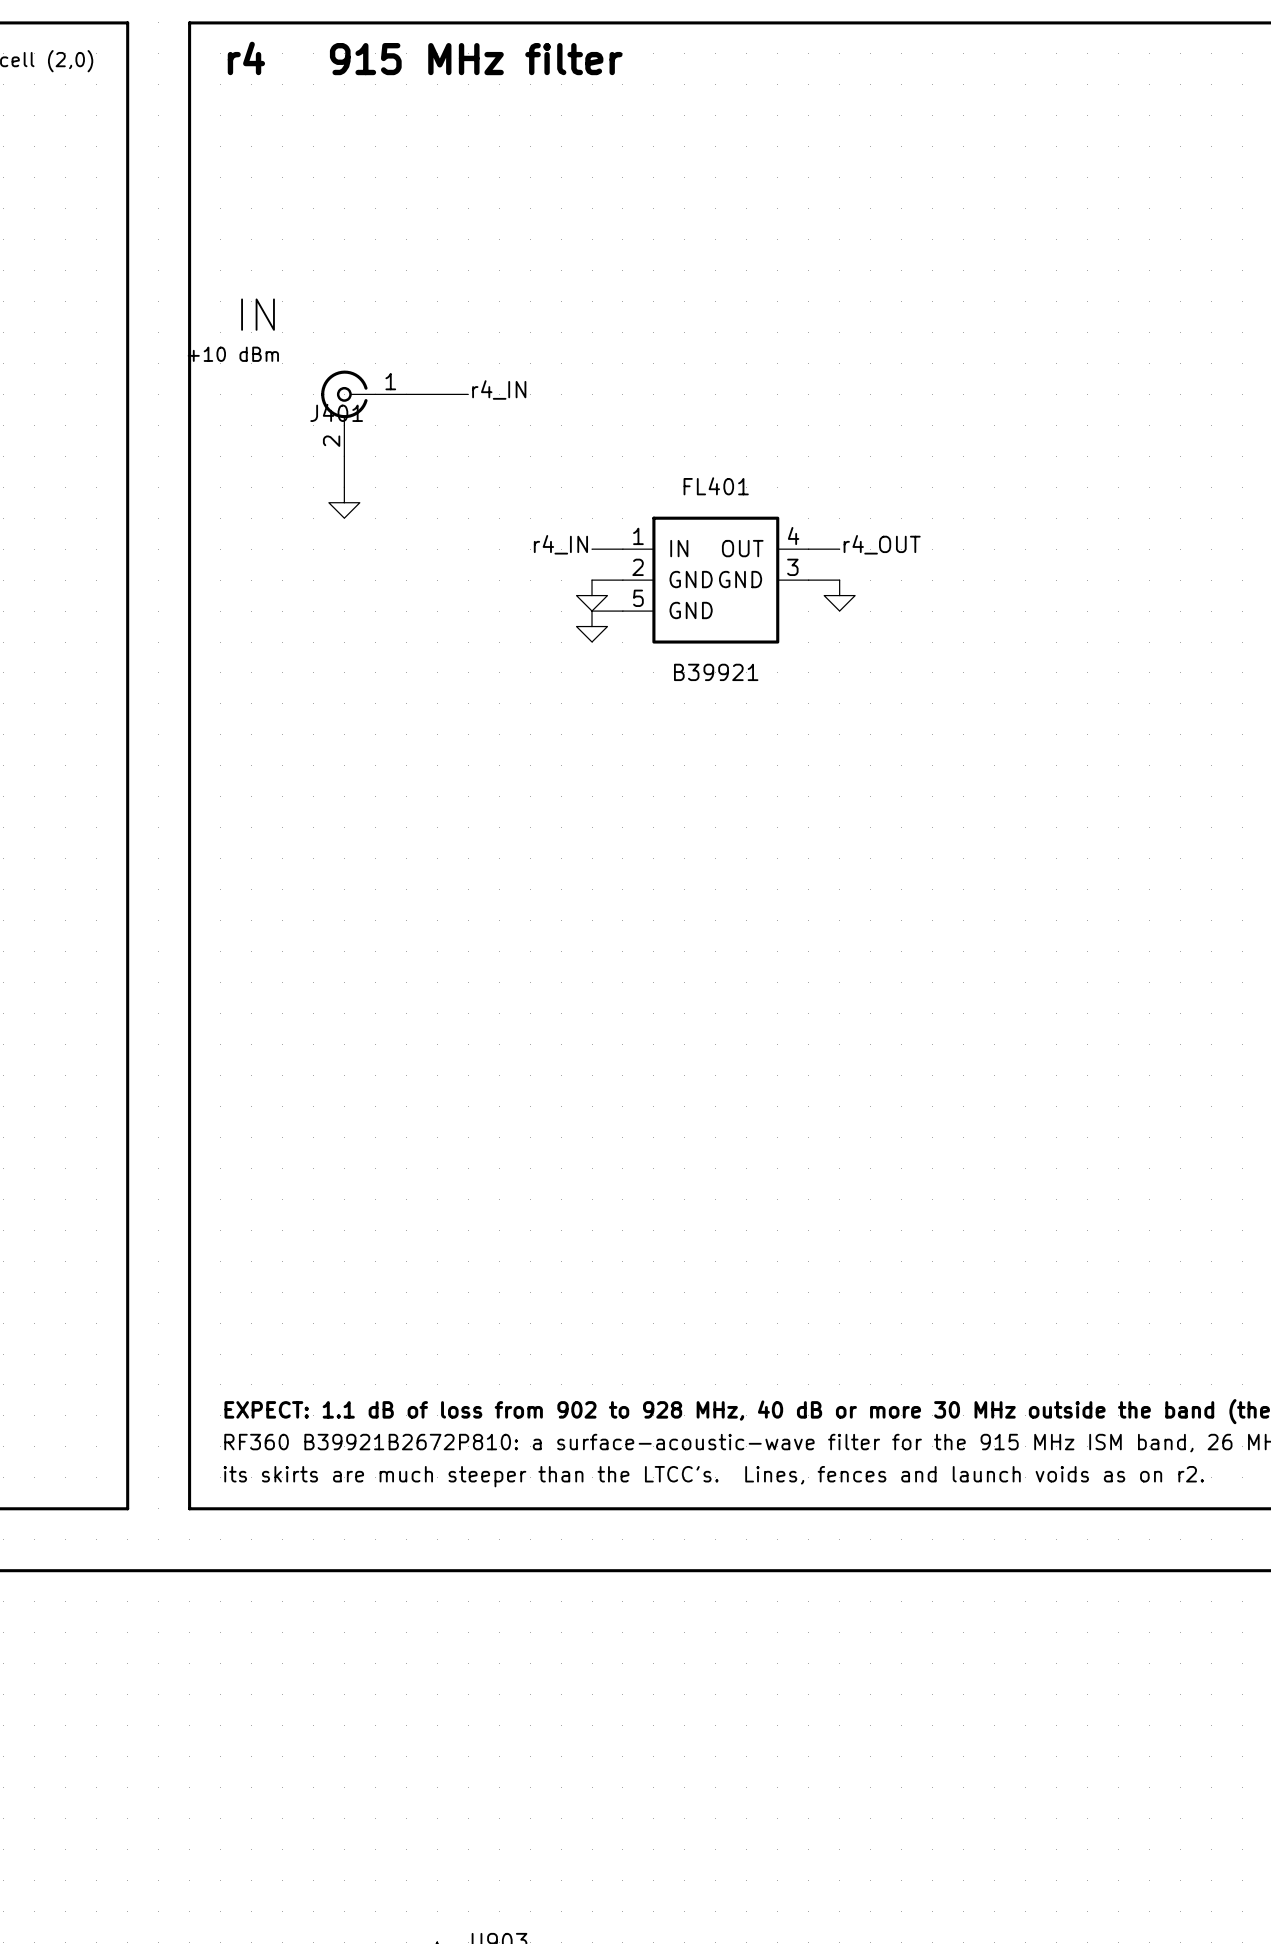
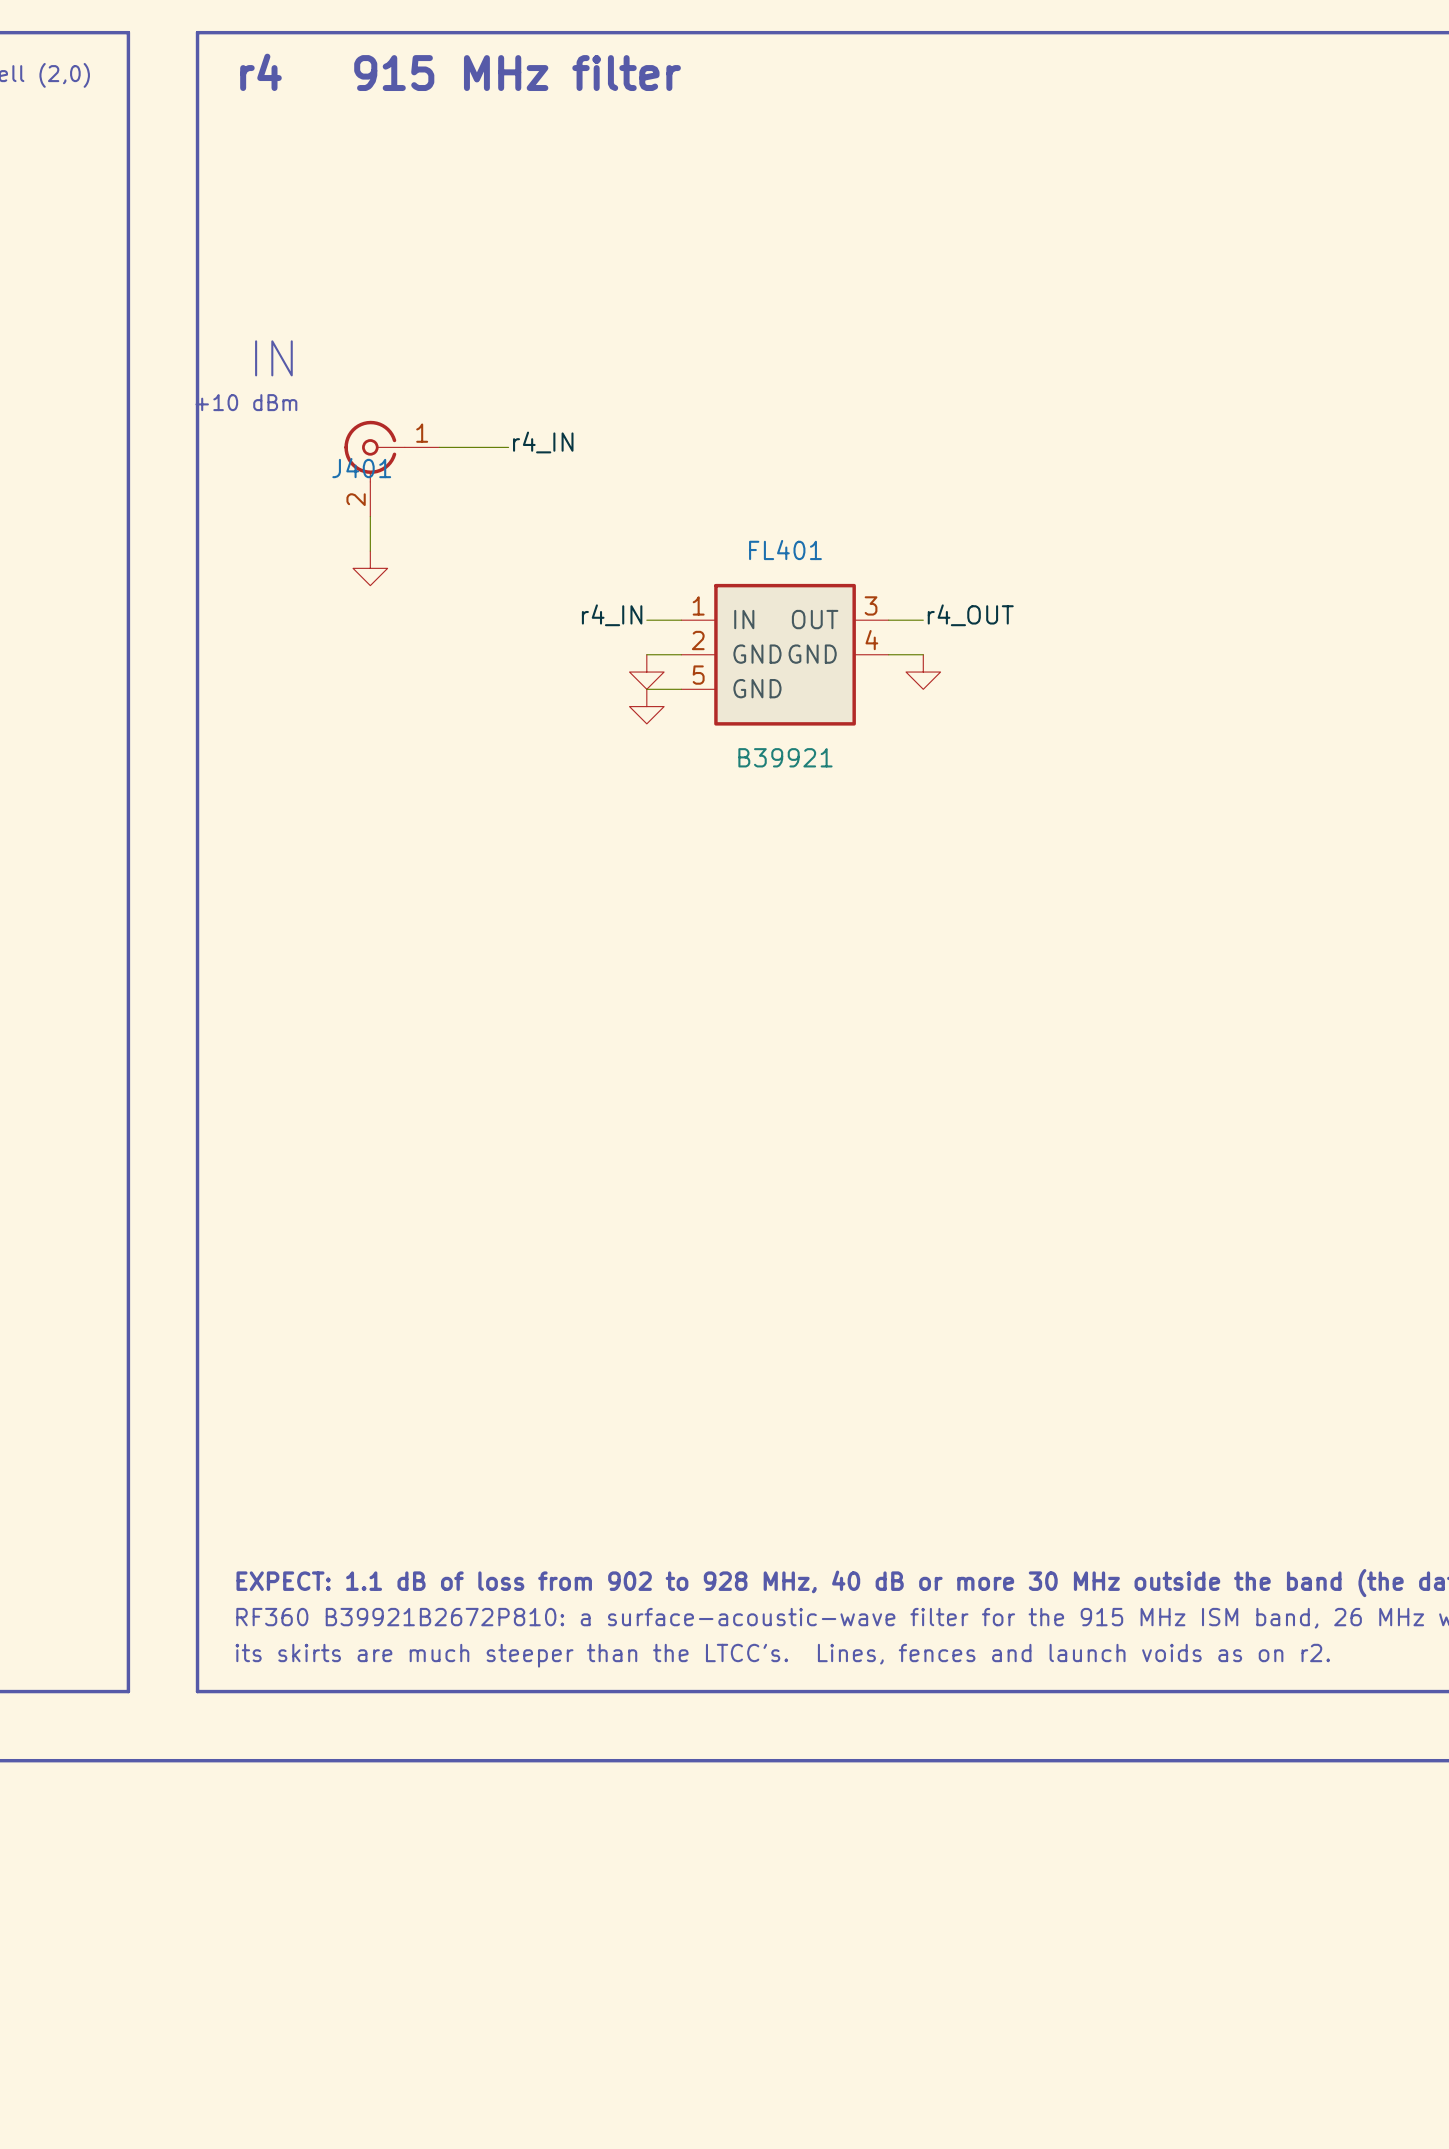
FL401 pin number: 4 (793, 536) -> 3 (871, 605)
FL401 pin number: 3 (792, 567) -> 4 (871, 640)

